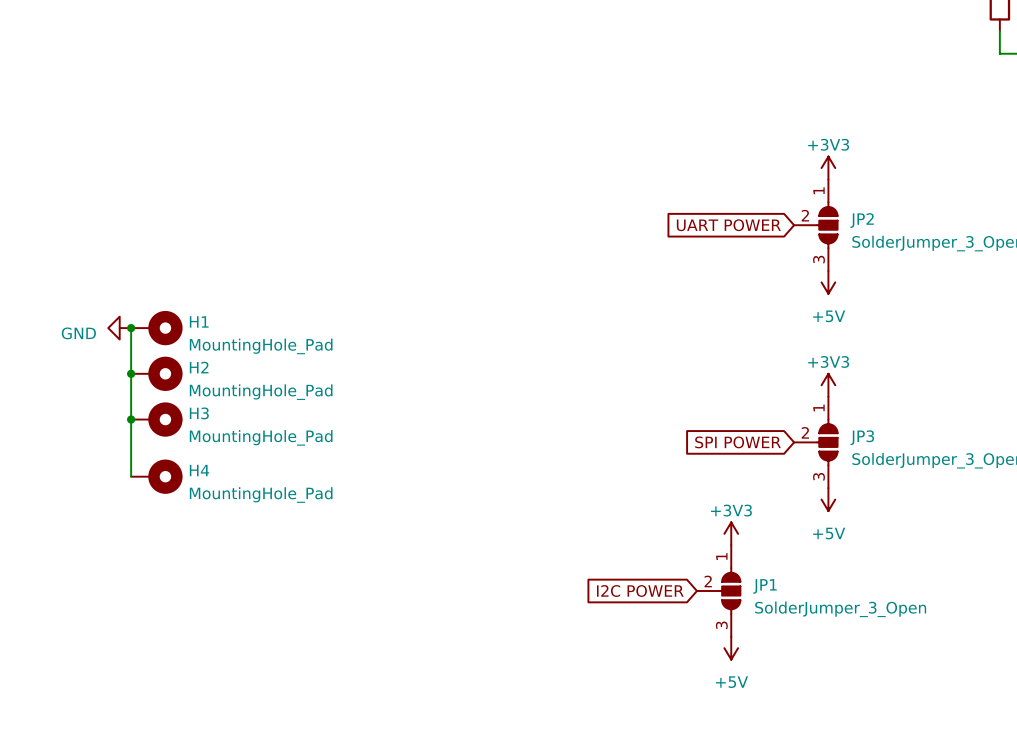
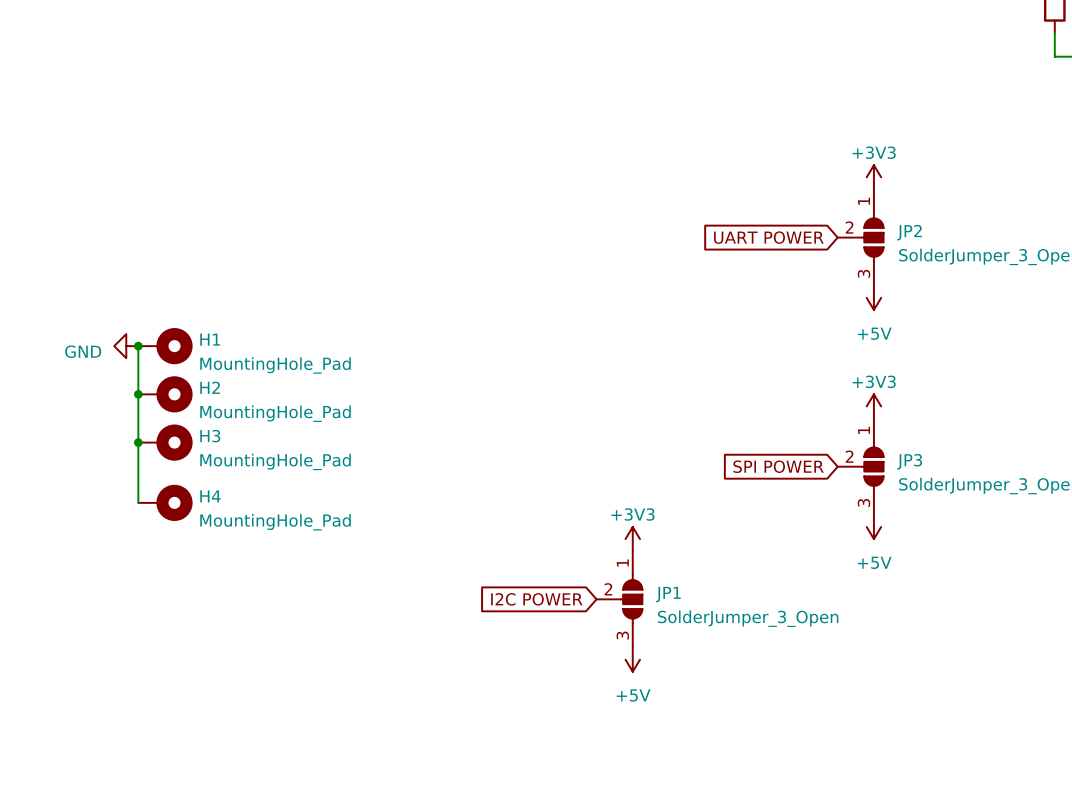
power symbol position: +3V3 (731, 533) -> +3V3 (632, 539)
global label position: I2C POWER (640, 591) -> I2C POWER (536, 599)
JP1 position: (718, 591) -> (619, 599)
power symbol position: +5V (731, 648) -> +5V (632, 659)

